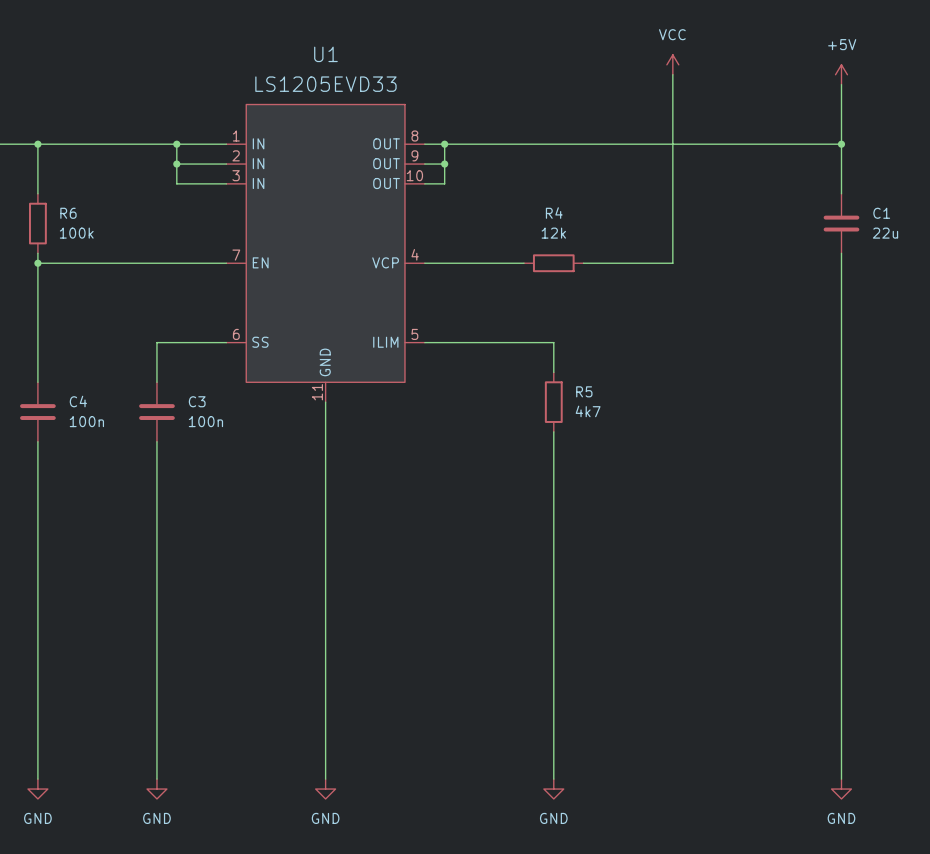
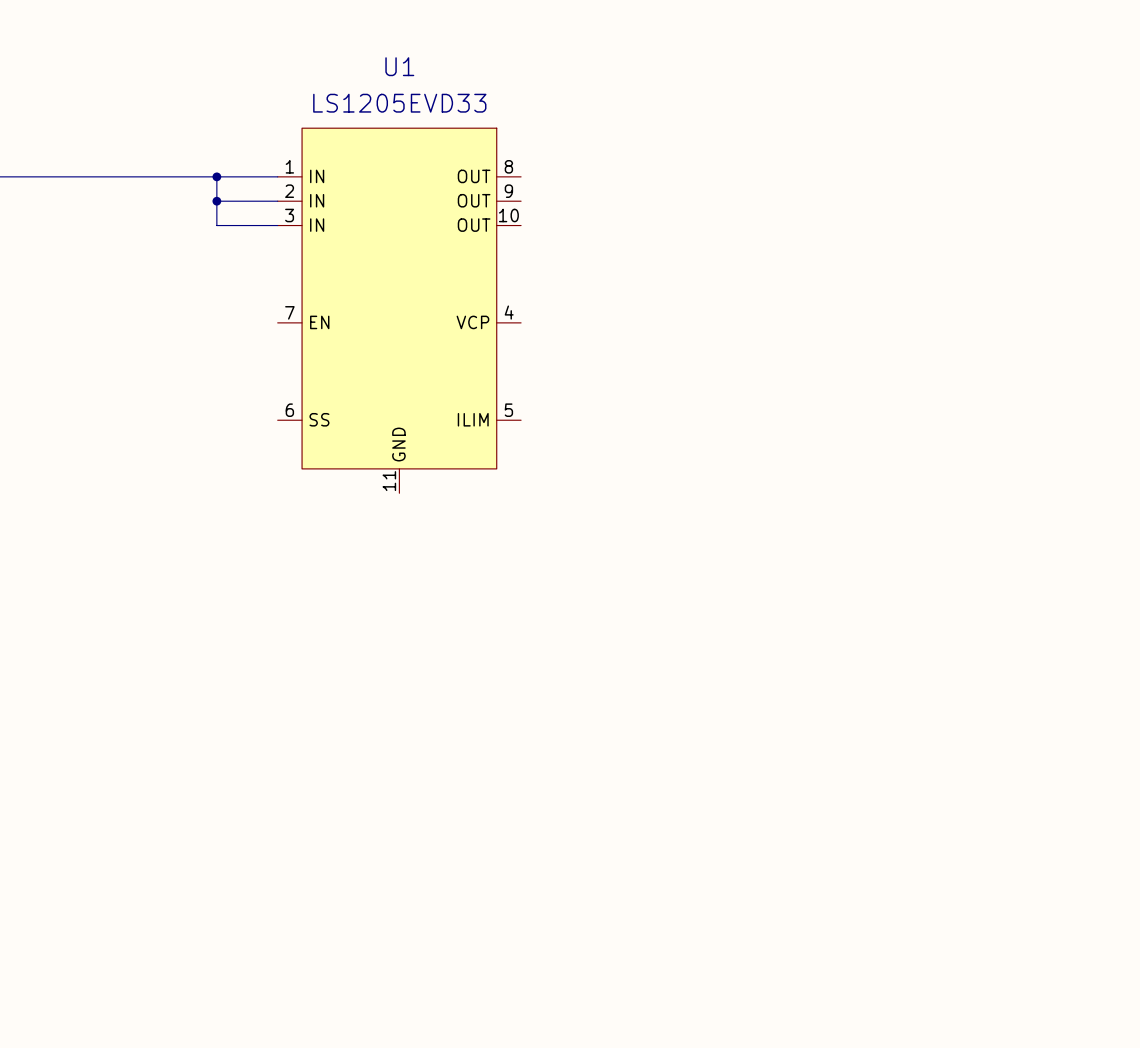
power symbol: VCC (672, 64) -> none
wire: (672, 74) (672, 263) (583, 263) -> none
power symbol: +5V (841, 74) -> none
wire: (841, 84) (841, 193) -> none
wire: (37, 144) (37, 193) -> none
junction: (37, 144) -> none
wire: (424, 144) (841, 144) -> none
wire: (444, 144) (444, 183) (424, 183) -> none
junction: (444, 144) -> none
junction: (841, 144) -> none
wire: (424, 164) (444, 164) -> none
junction: (444, 164) -> none
R6: 100k (37, 223) -> none
C1: 22u (841, 223) -> none
wire: (37, 253) (37, 382) -> none
wire: (841, 253) (841, 779) -> none
wire: (37, 263) (226, 263) -> none
junction: (37, 263) -> none
wire: (424, 263) (524, 263) -> none
R4: 12k (553, 263) -> none
wire: (226, 342) (156, 342) (156, 382) -> none
wire: (424, 342) (553, 342) (553, 372) -> none
wire: (325, 402) (325, 779) -> none
R5: 4k7 (553, 402) -> none
C4: 100n (37, 412) -> none
C3: 100n (156, 412) -> none
wire: (553, 431) (553, 779) -> none
wire: (37, 441) (37, 779) -> none
wire: (156, 441) (156, 779) -> none
power symbol: GND (37, 789) -> none
power symbol: GND (156, 789) -> none
power symbol: GND (325, 789) -> none
power symbol: GND (553, 789) -> none
power symbol: GND (841, 789) -> none

